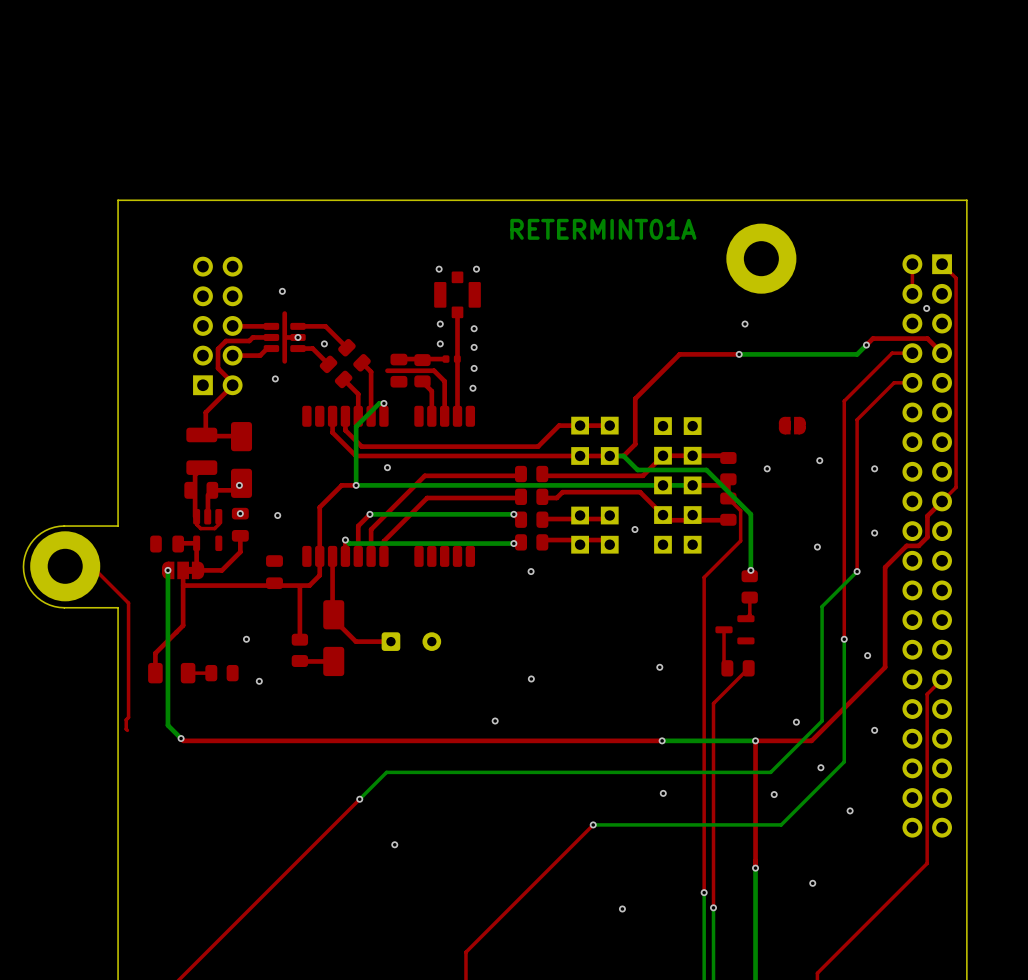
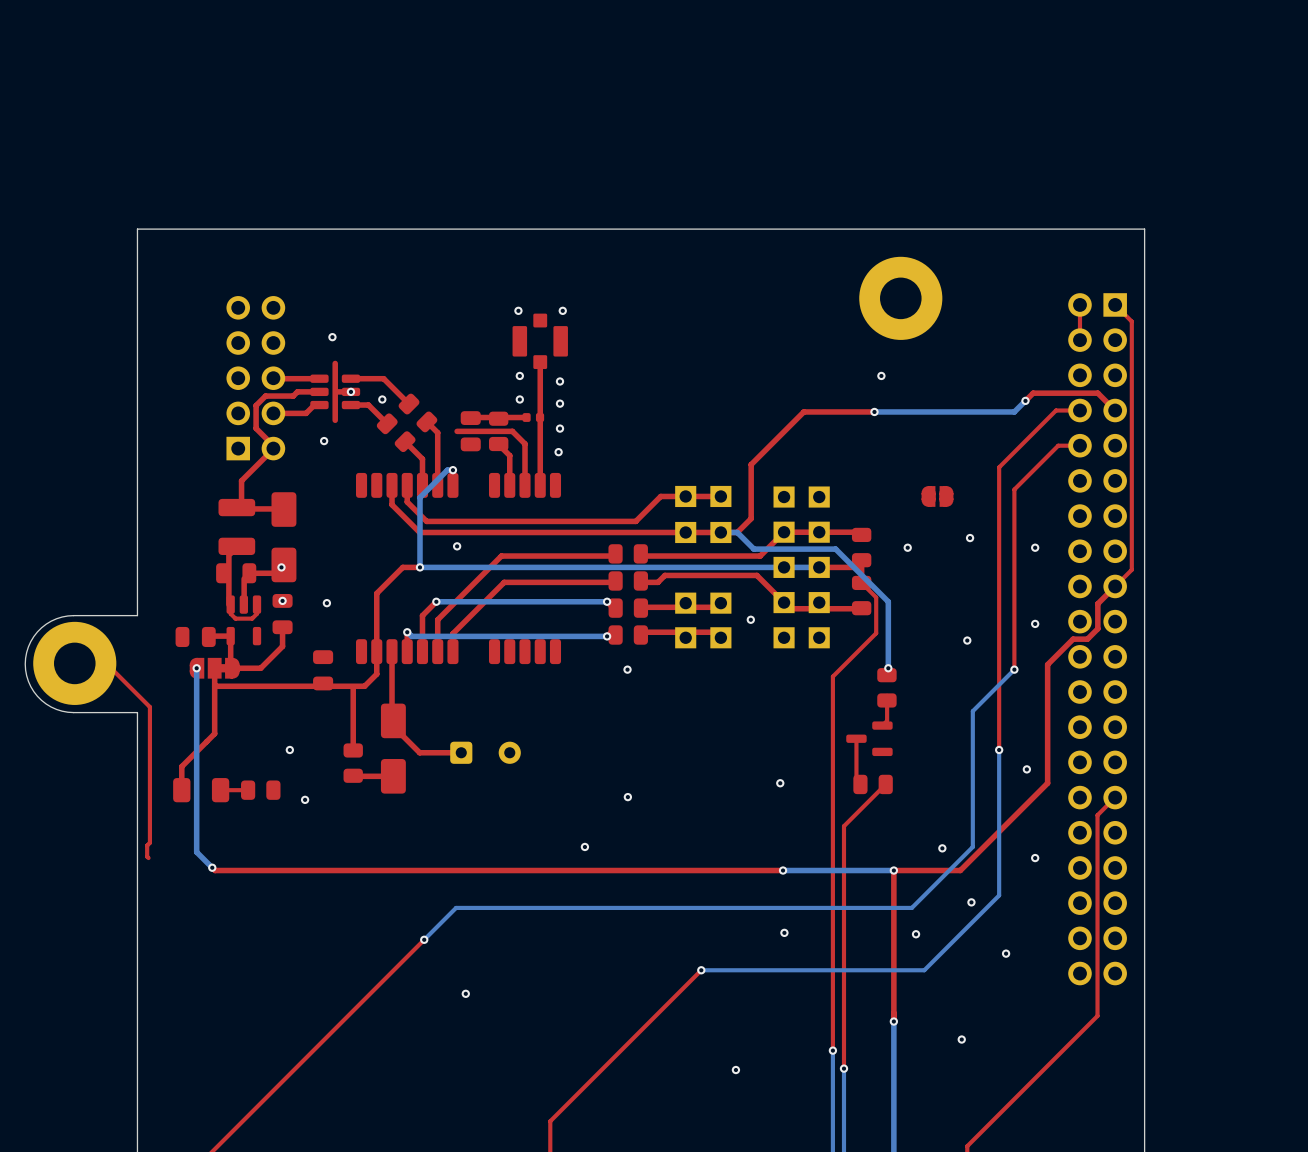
text: RETERMINT01A (603, 229) -> none
via: (926, 308) -> none

